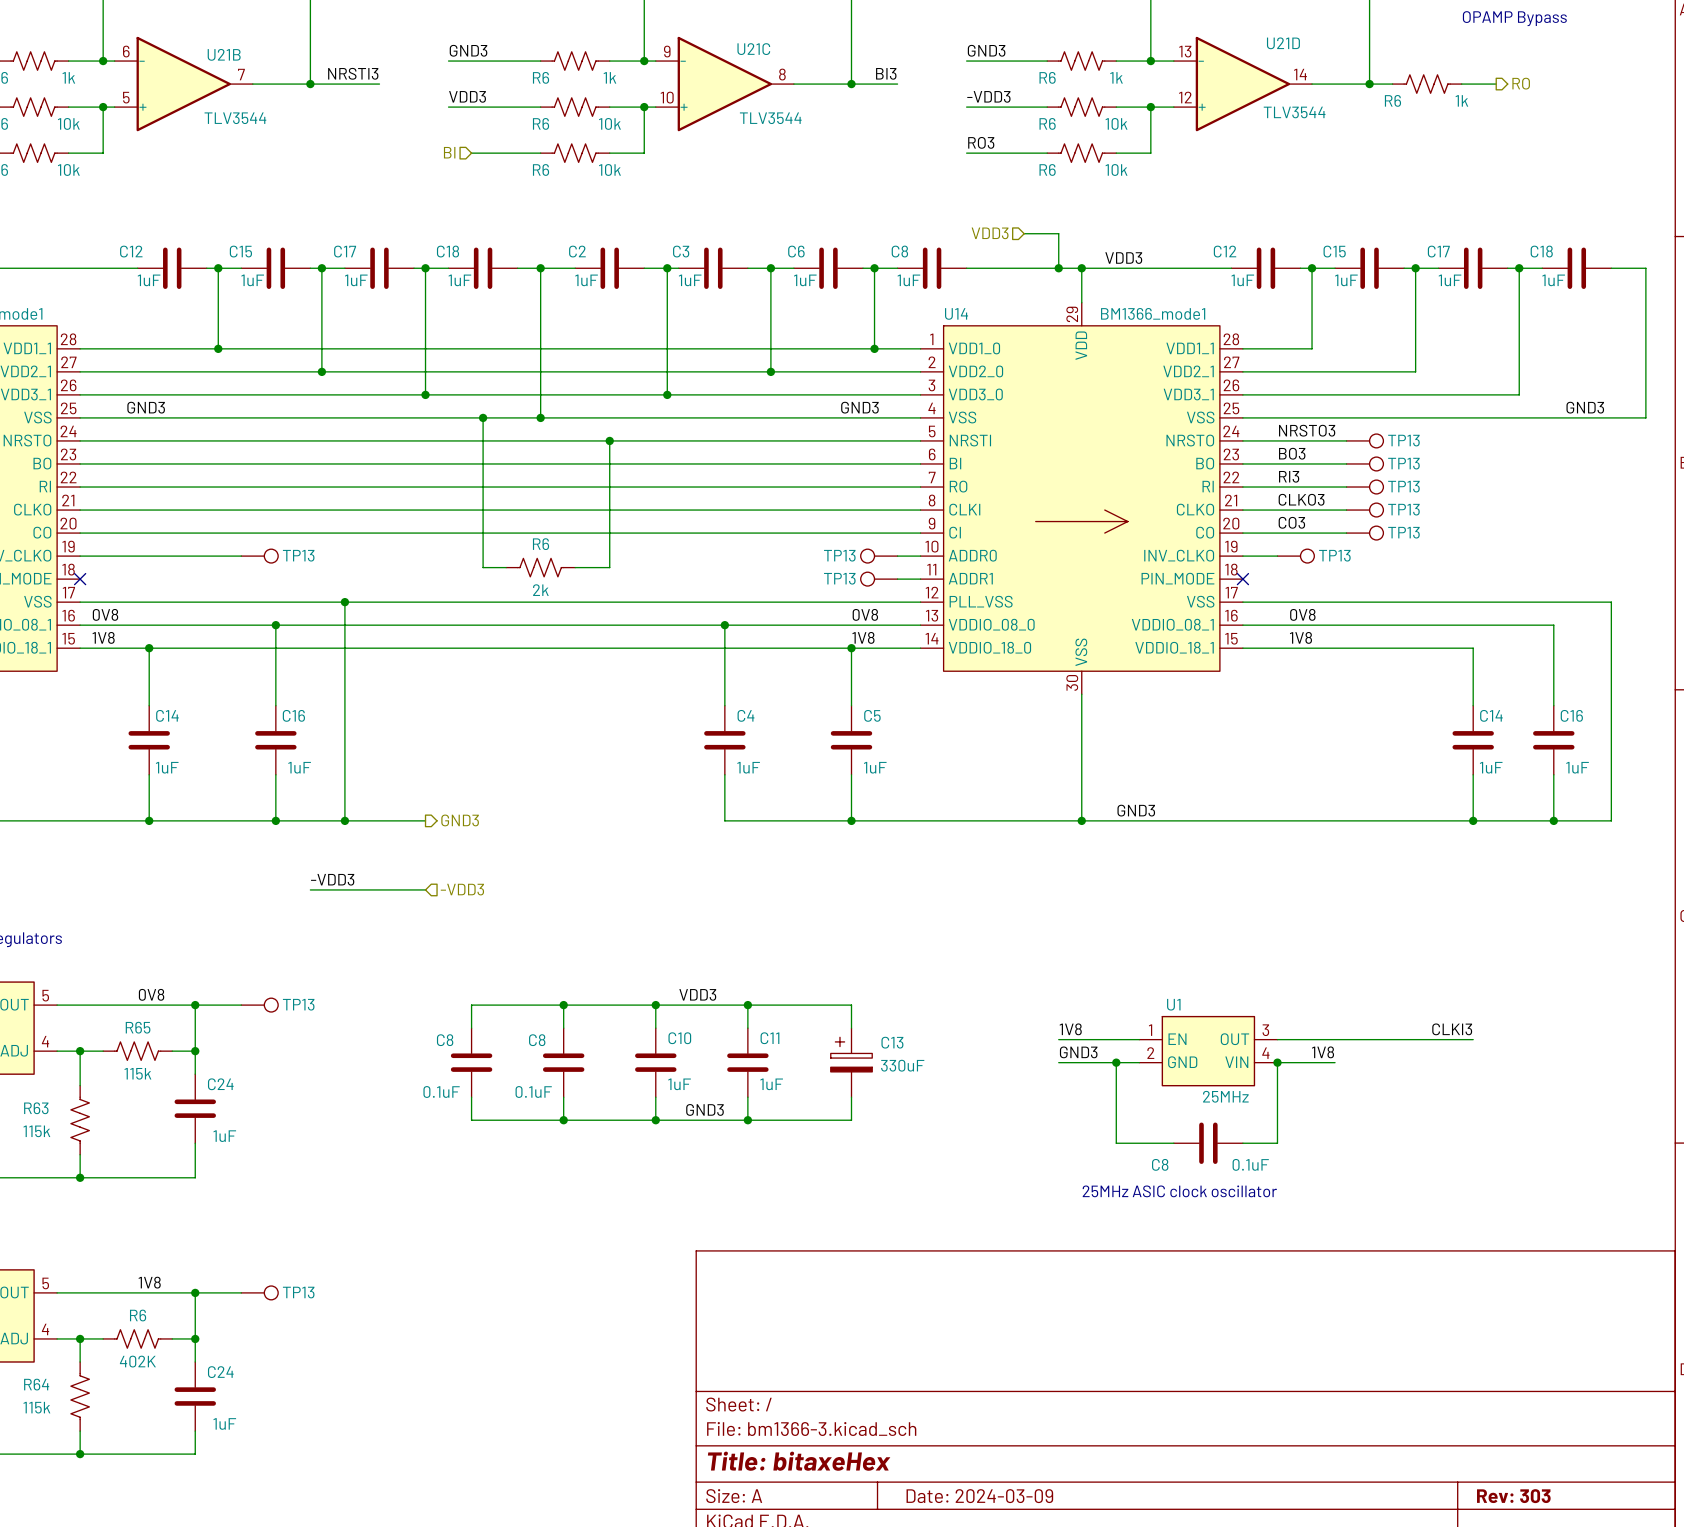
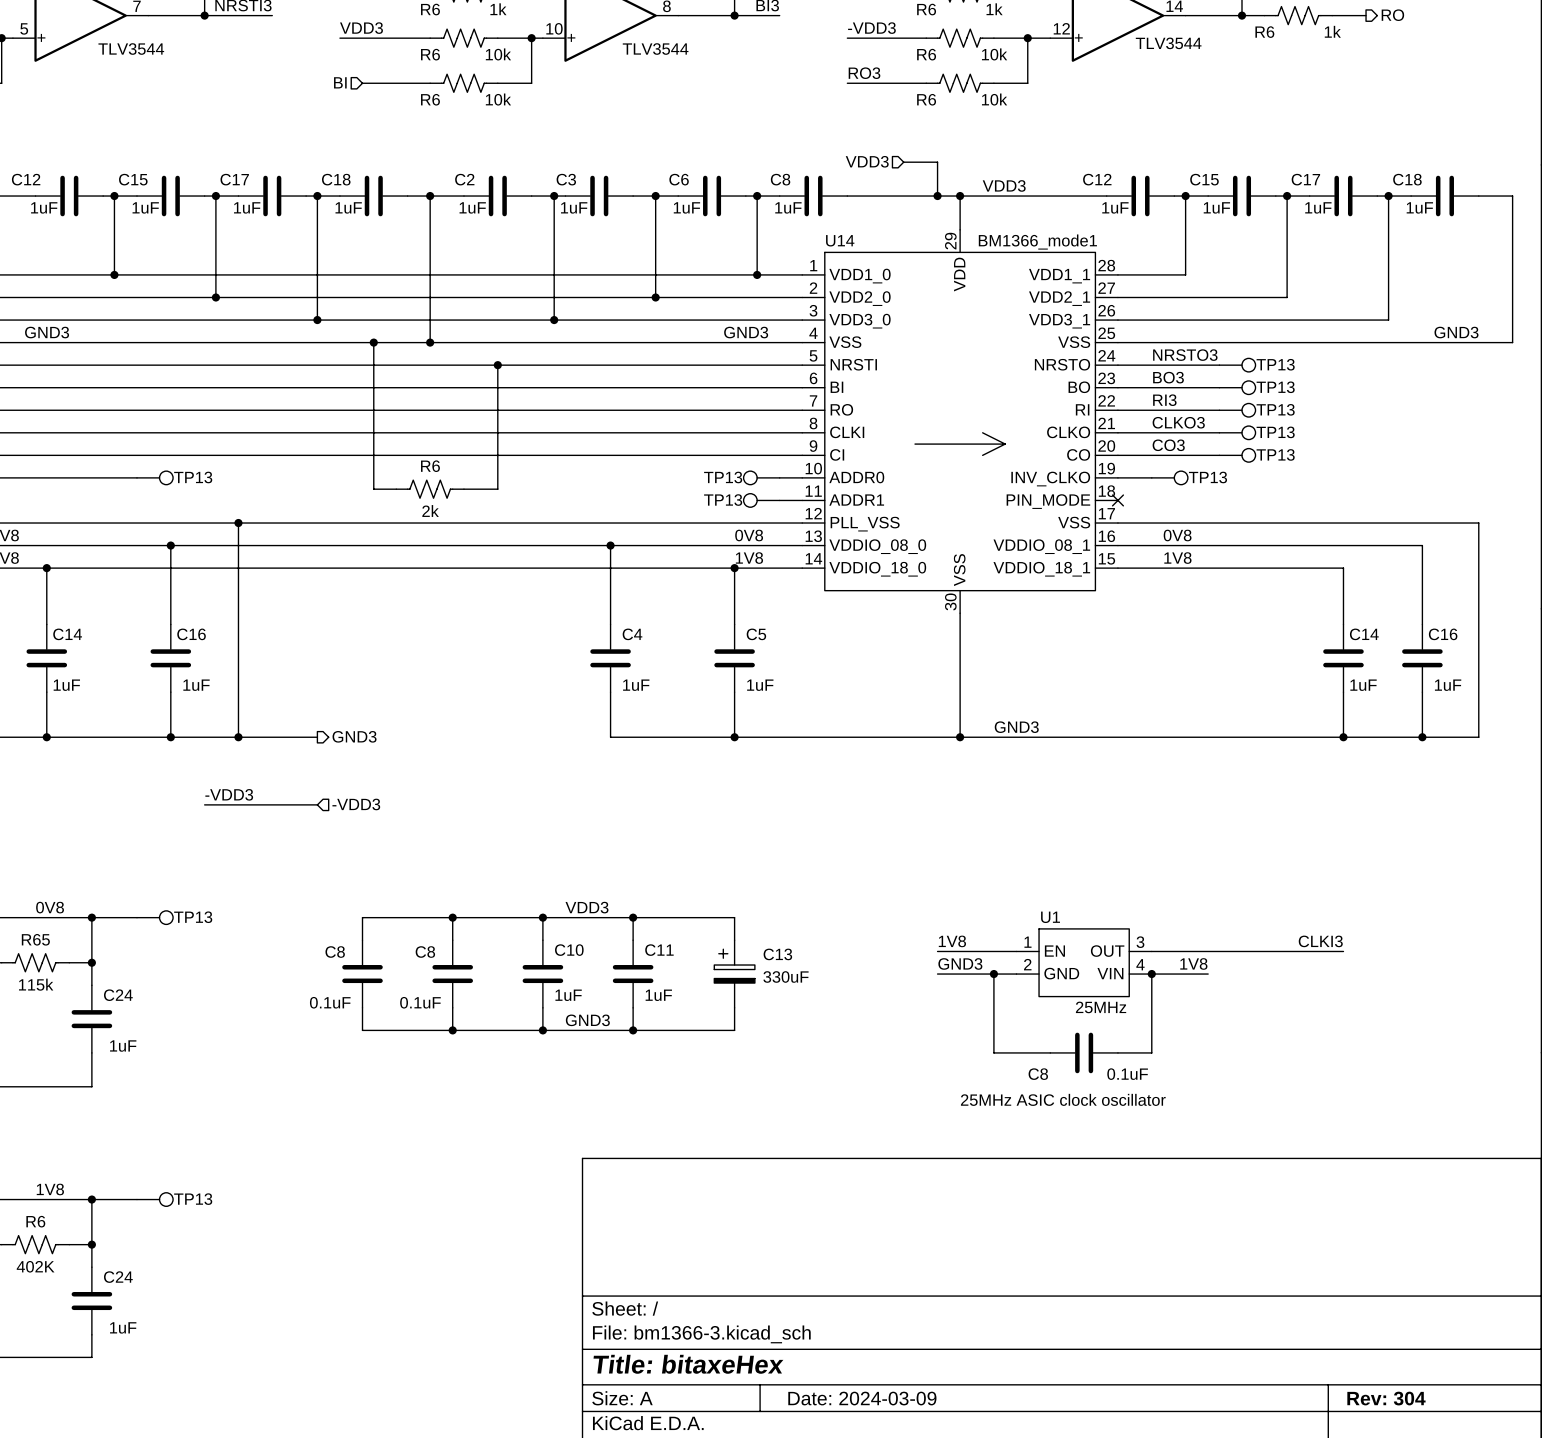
title block: Rev: 303 (1513, 1496) -> Rev: 304 (1386, 1398)

